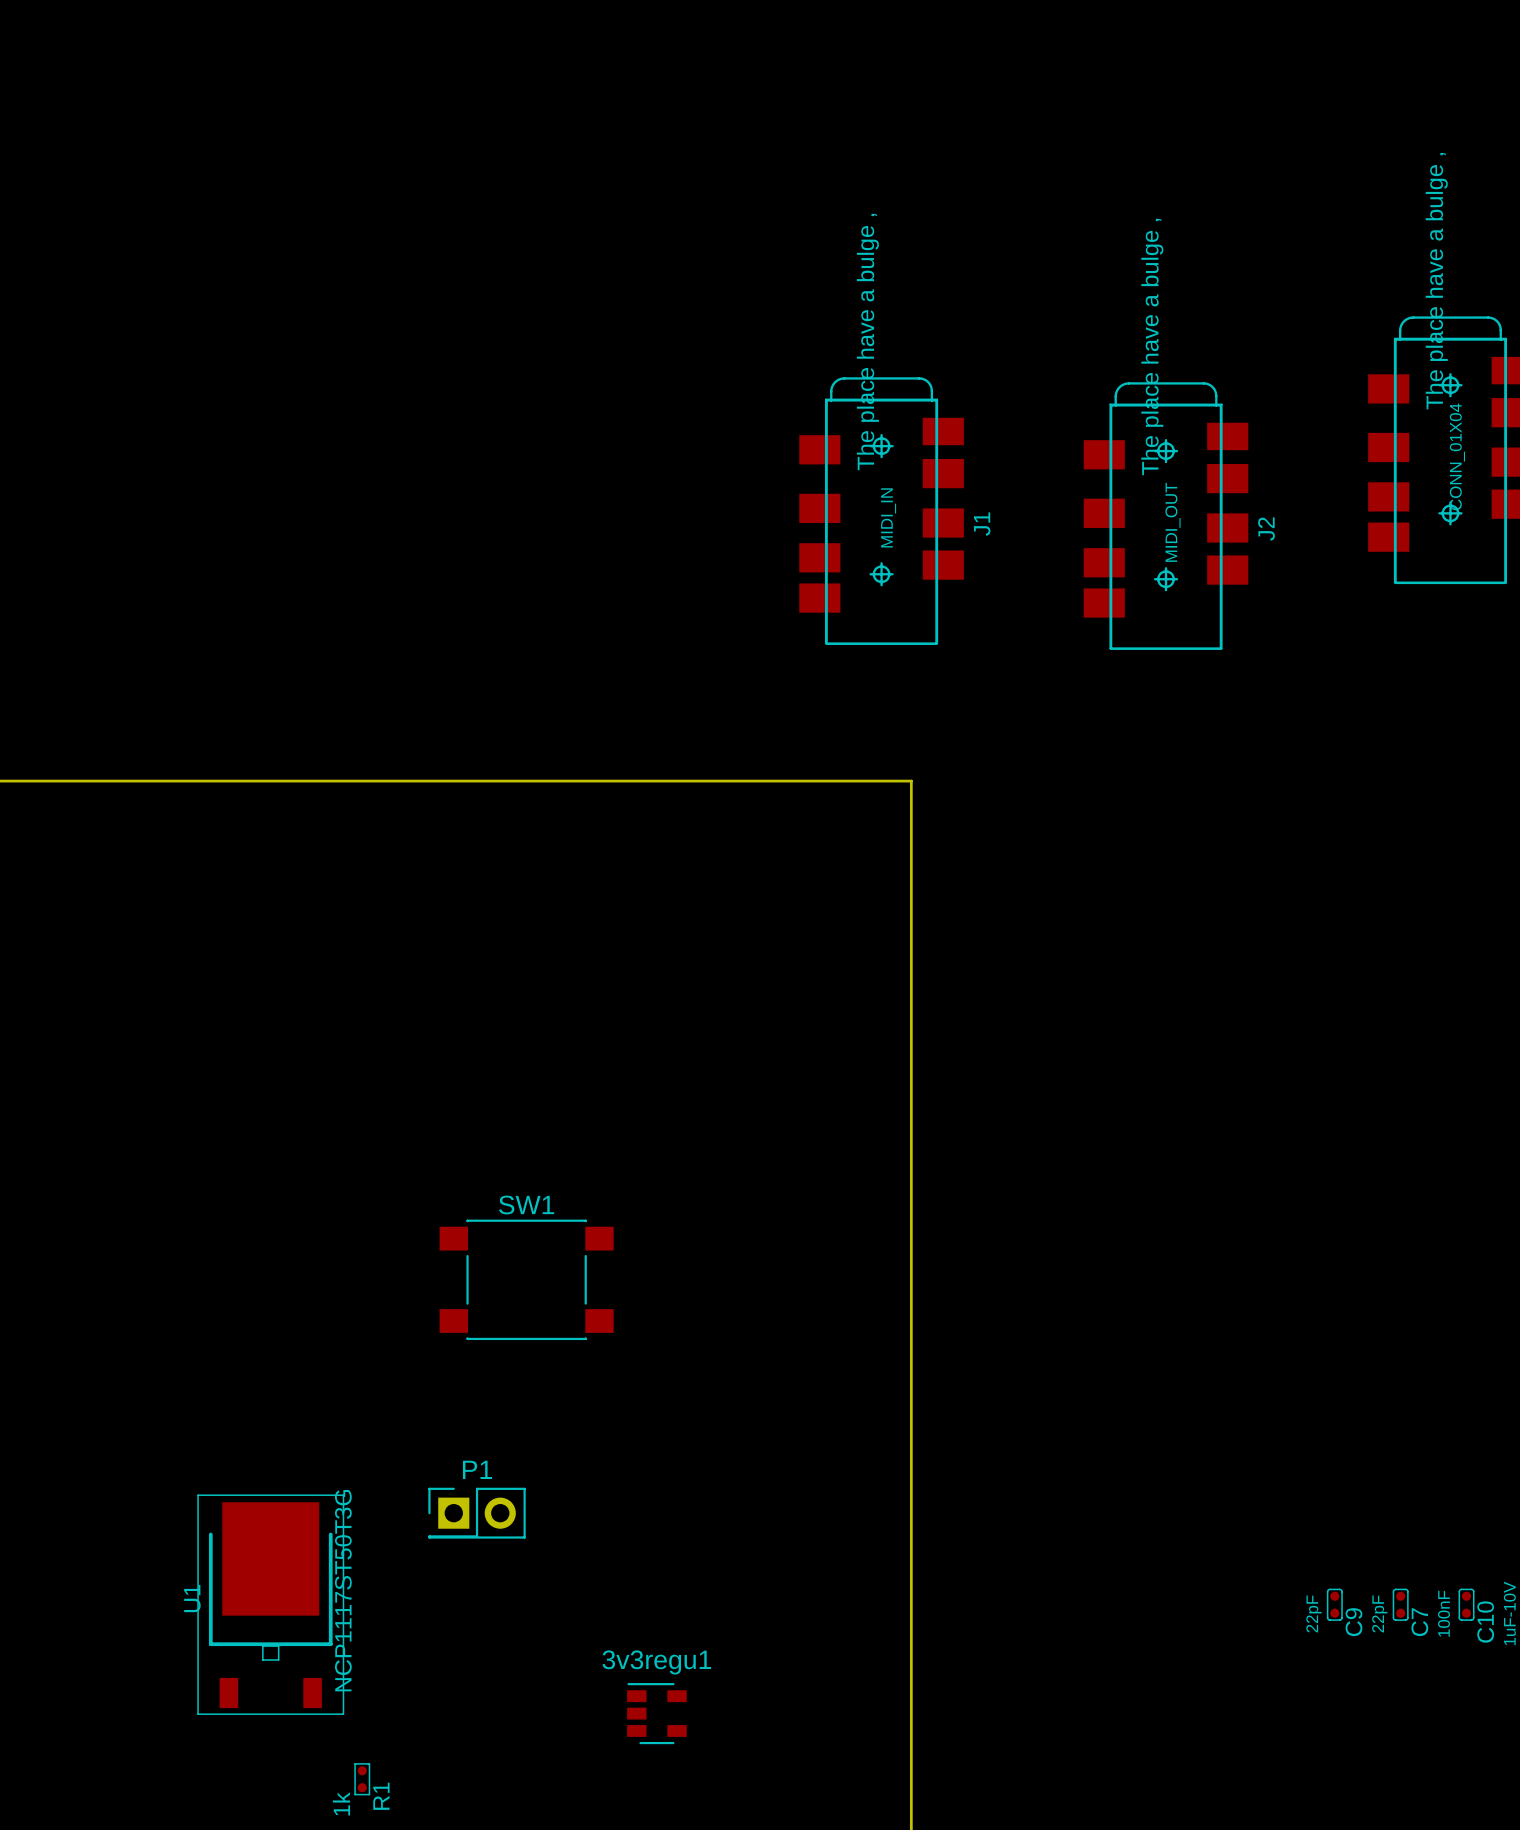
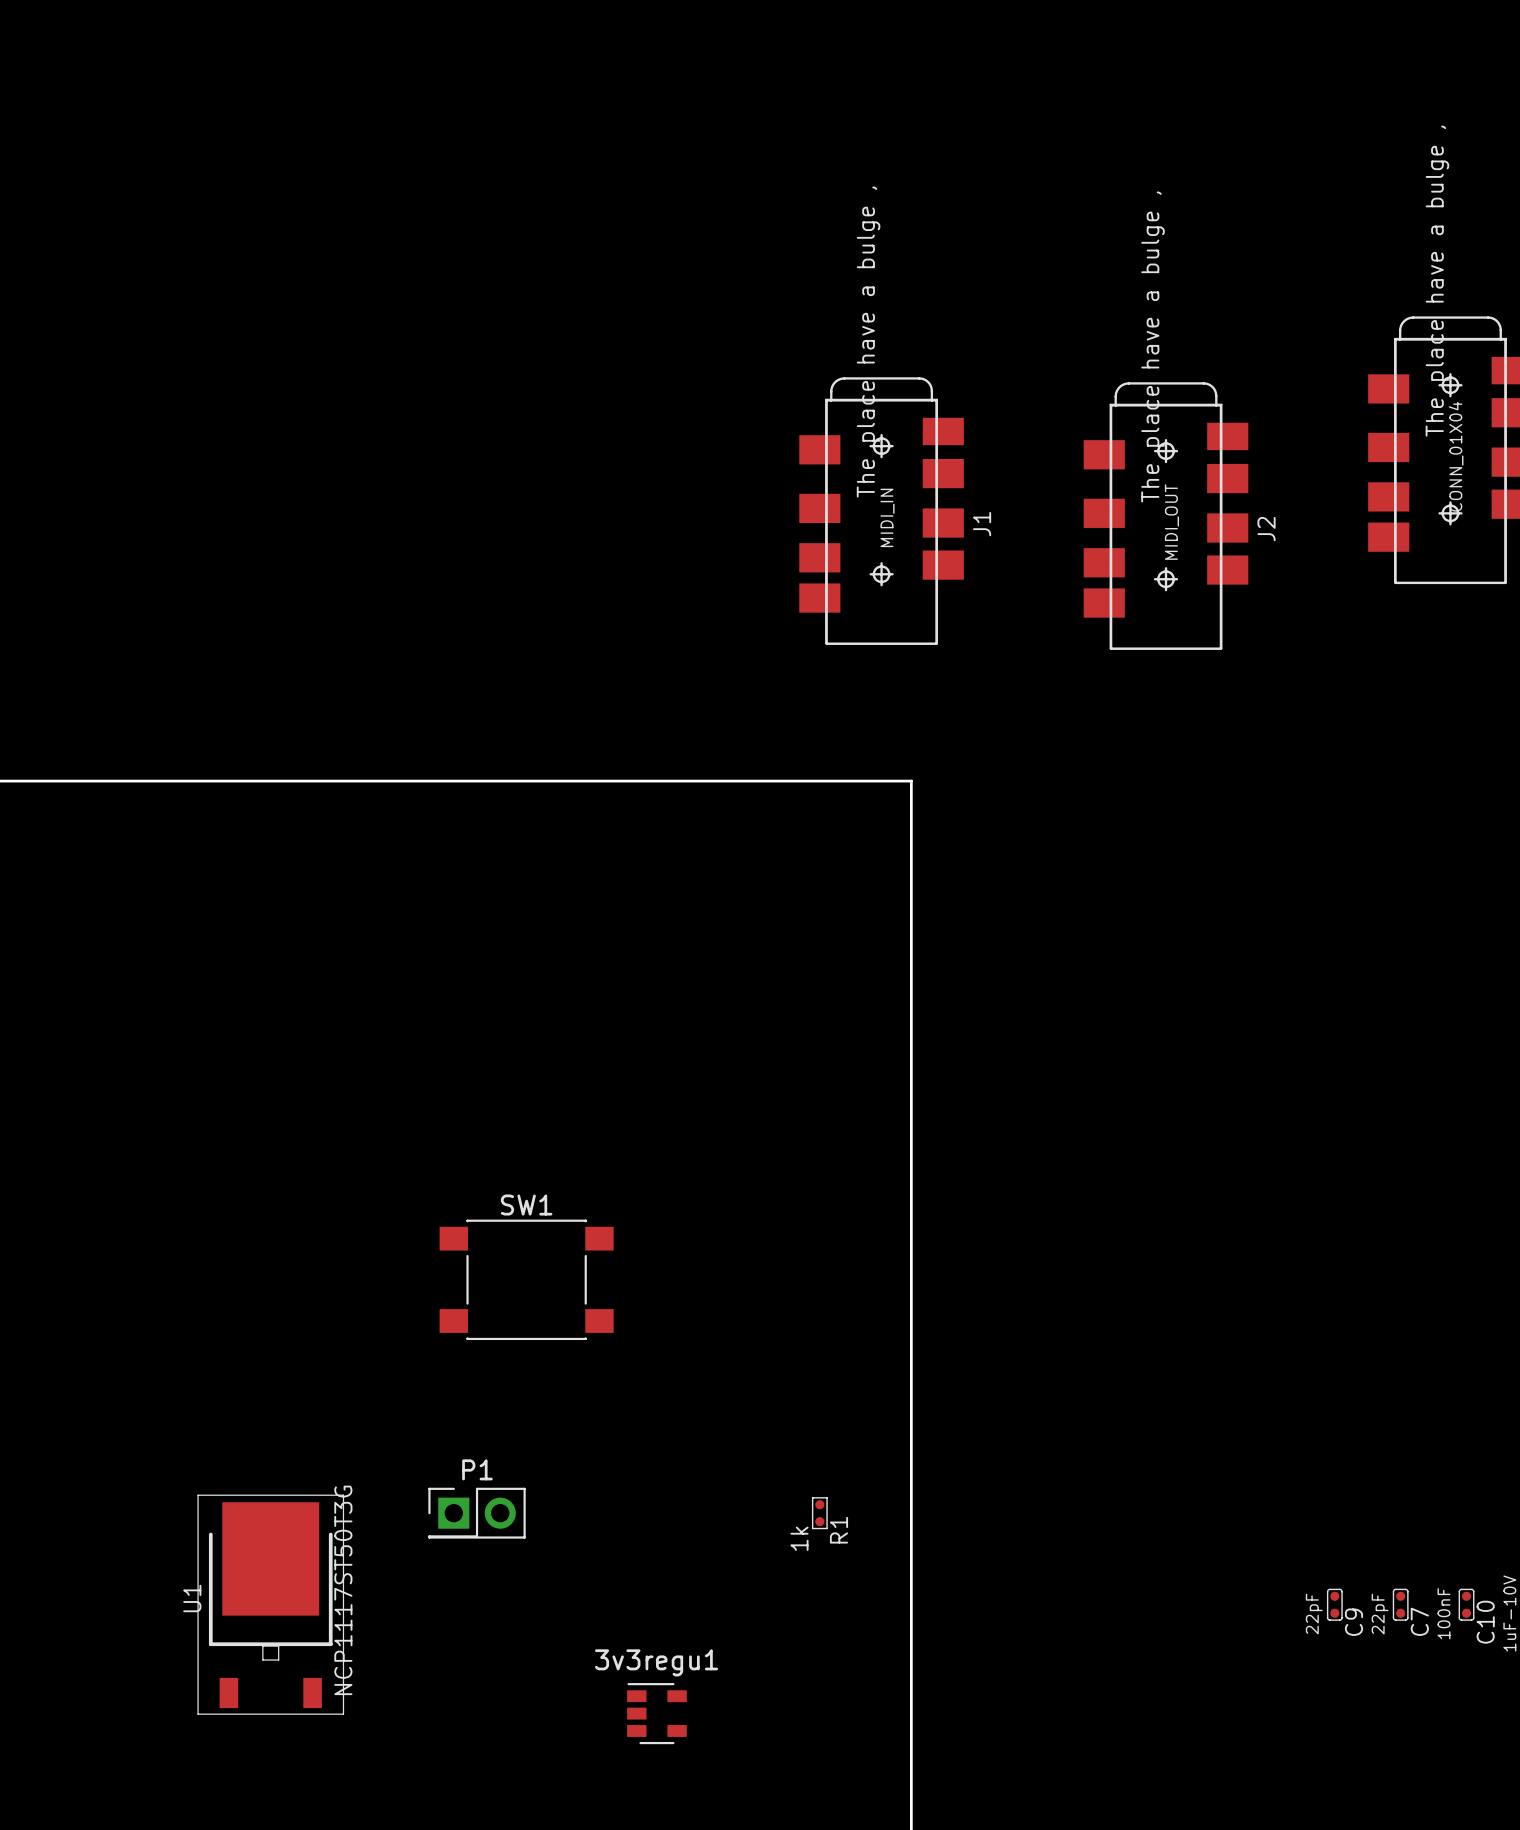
R1 position: (362, 1779) -> (819, 1513)

